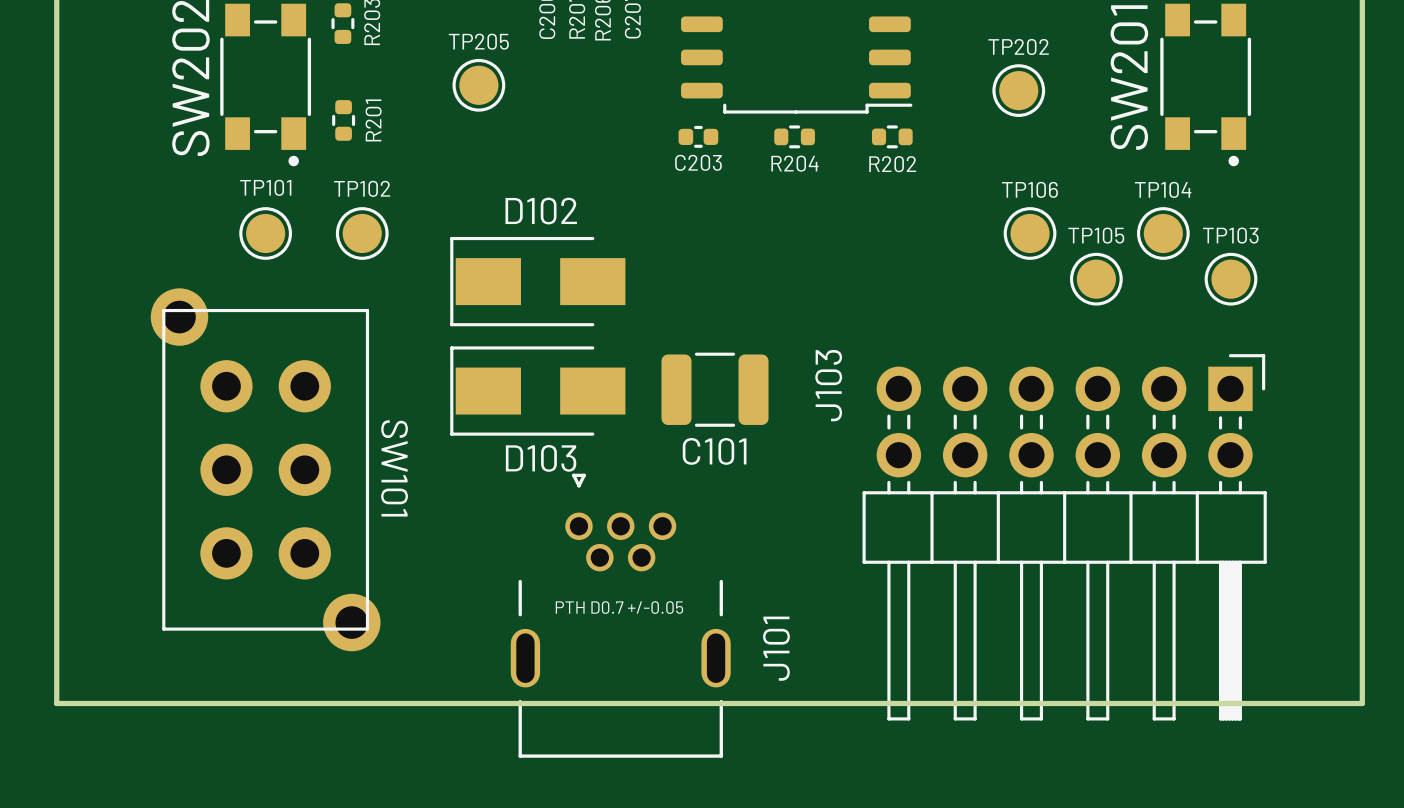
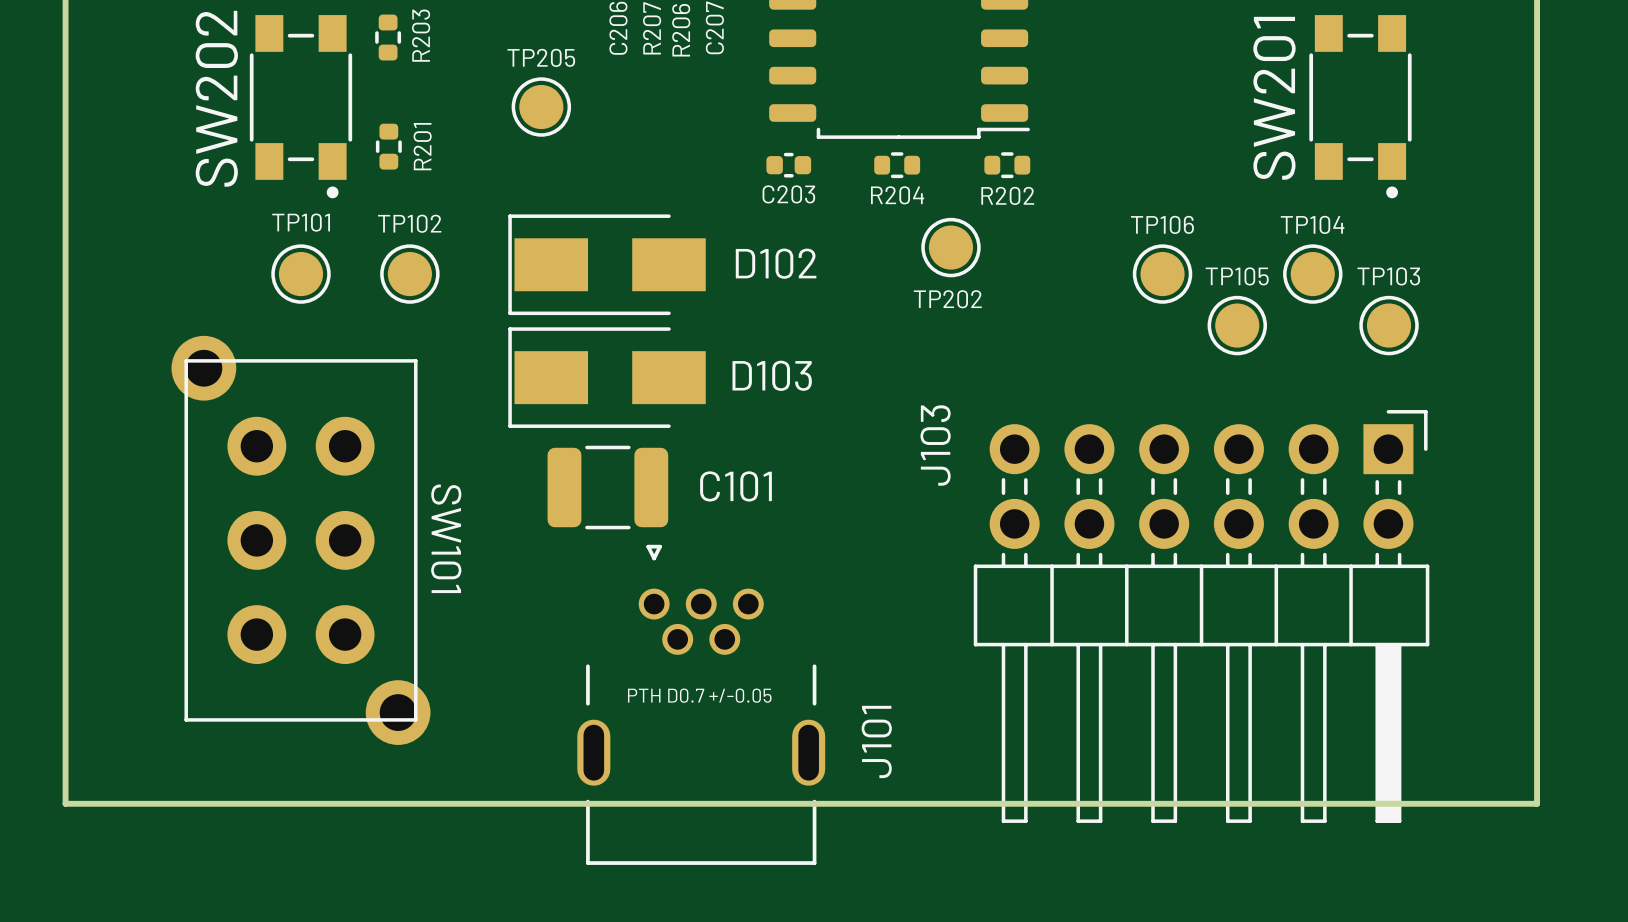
TP202 name position: TP202 (1018, 46) -> TP202 (947, 299)
TP202 position: (1018, 90) -> (950, 247)
D102 name position: D102 (541, 211) -> D102 (776, 263)
D102 position: (537, 281) -> (607, 264)
C101 position: (715, 389) -> (607, 487)
D103 position: (537, 391) -> (607, 377)
C101 name position: C101 (714, 451) -> C101 (736, 486)
D103 name position: D103 (541, 458) -> D103 (772, 375)

